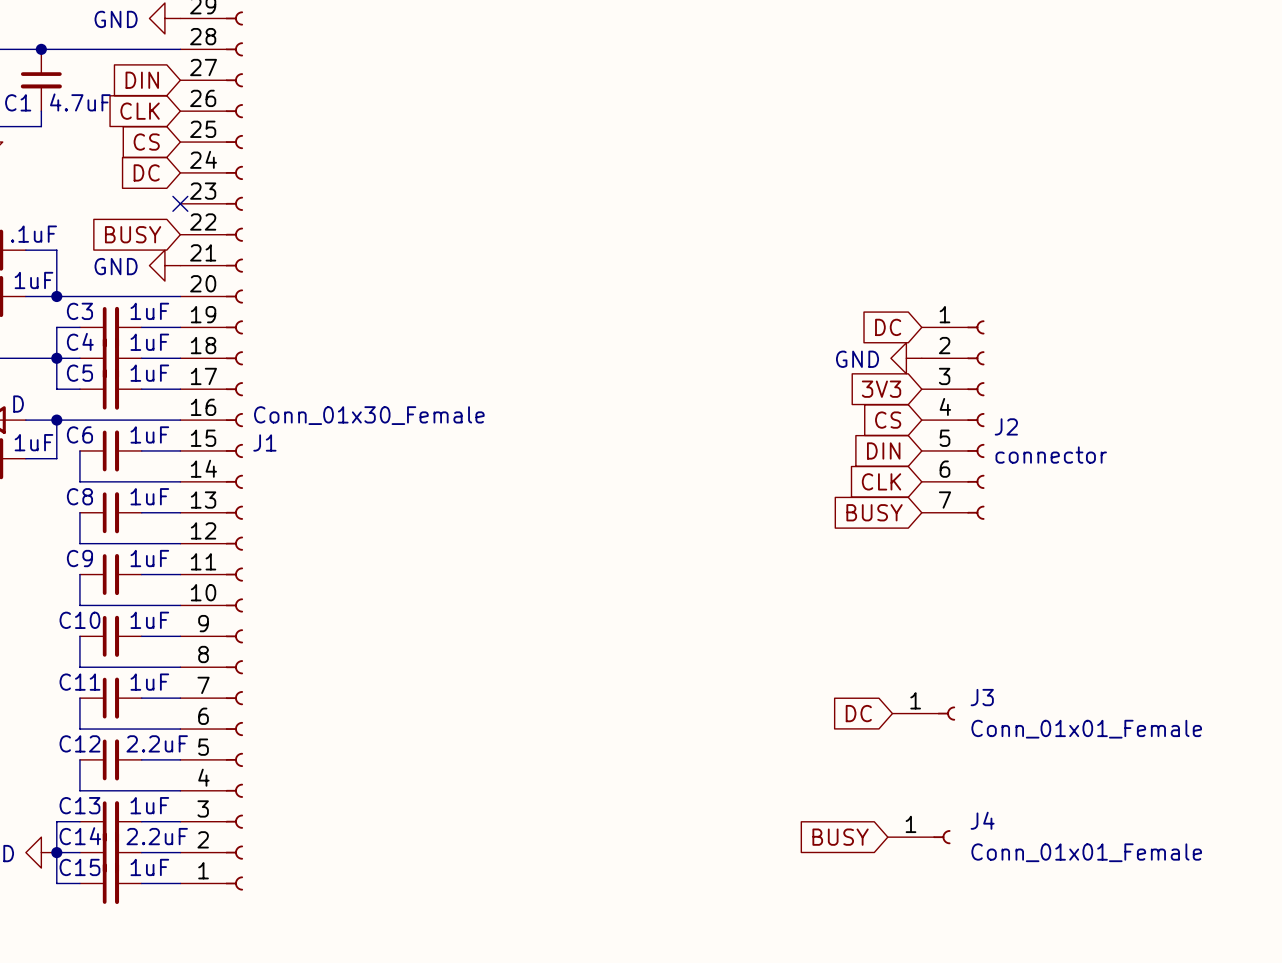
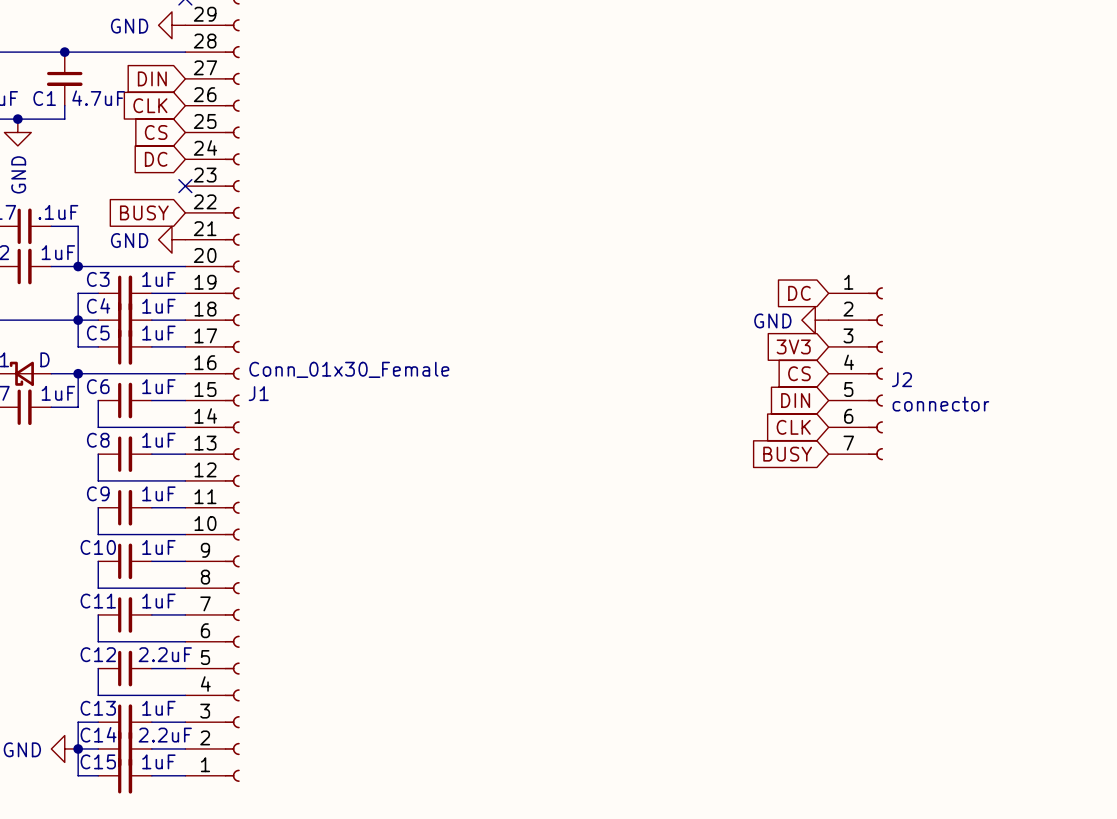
global label: DC (858, 713) -> none
J3: Conn_01x01_Female (923, 713) -> none
global label: BUSY (840, 837) -> none
J4: Conn_01x01_Female (919, 837) -> none

